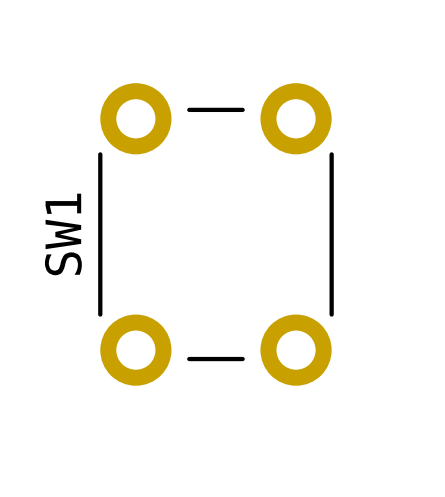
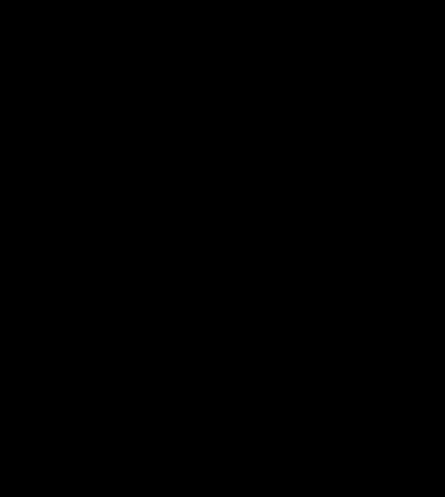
SW1: (215, 234) -> none

